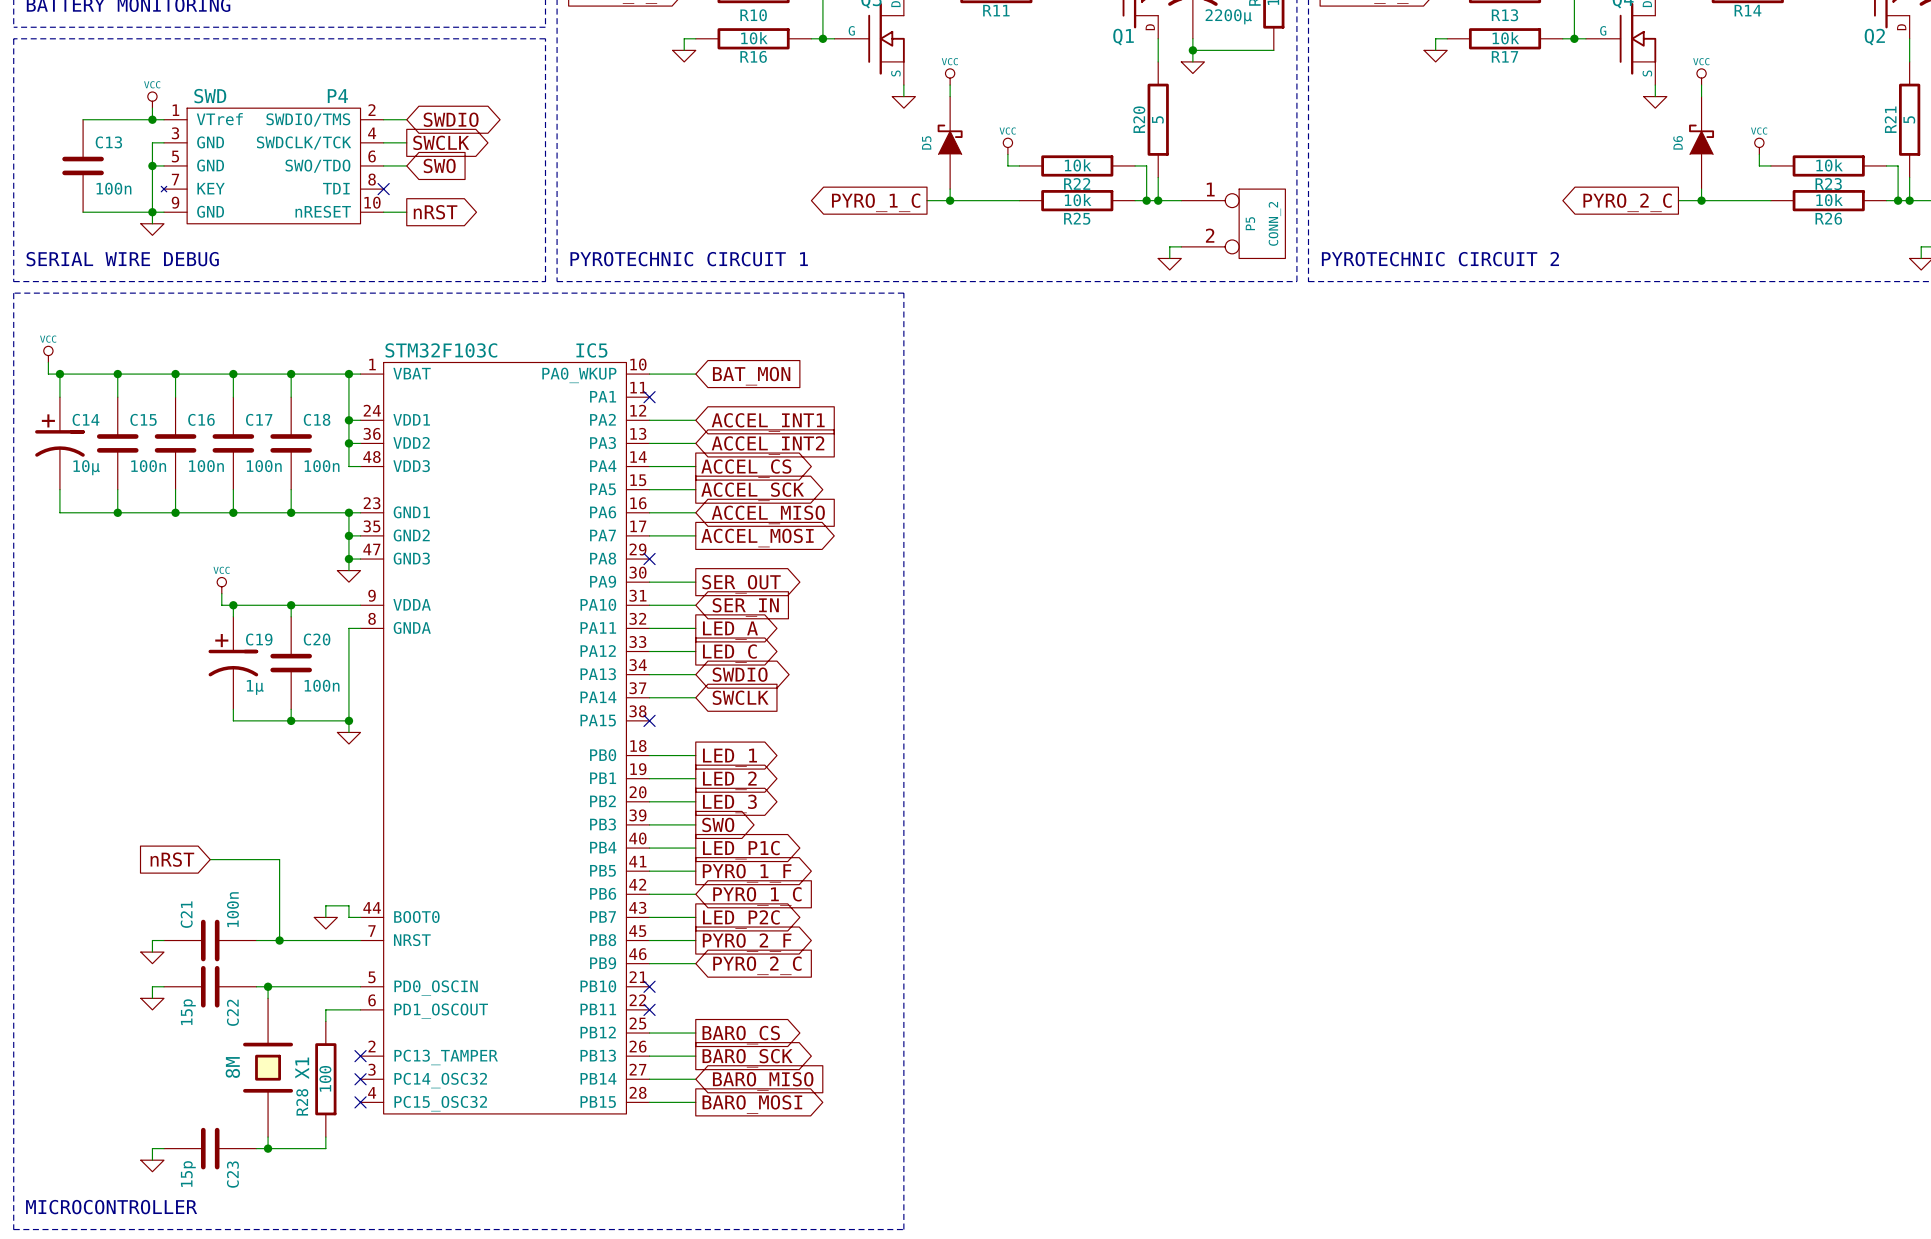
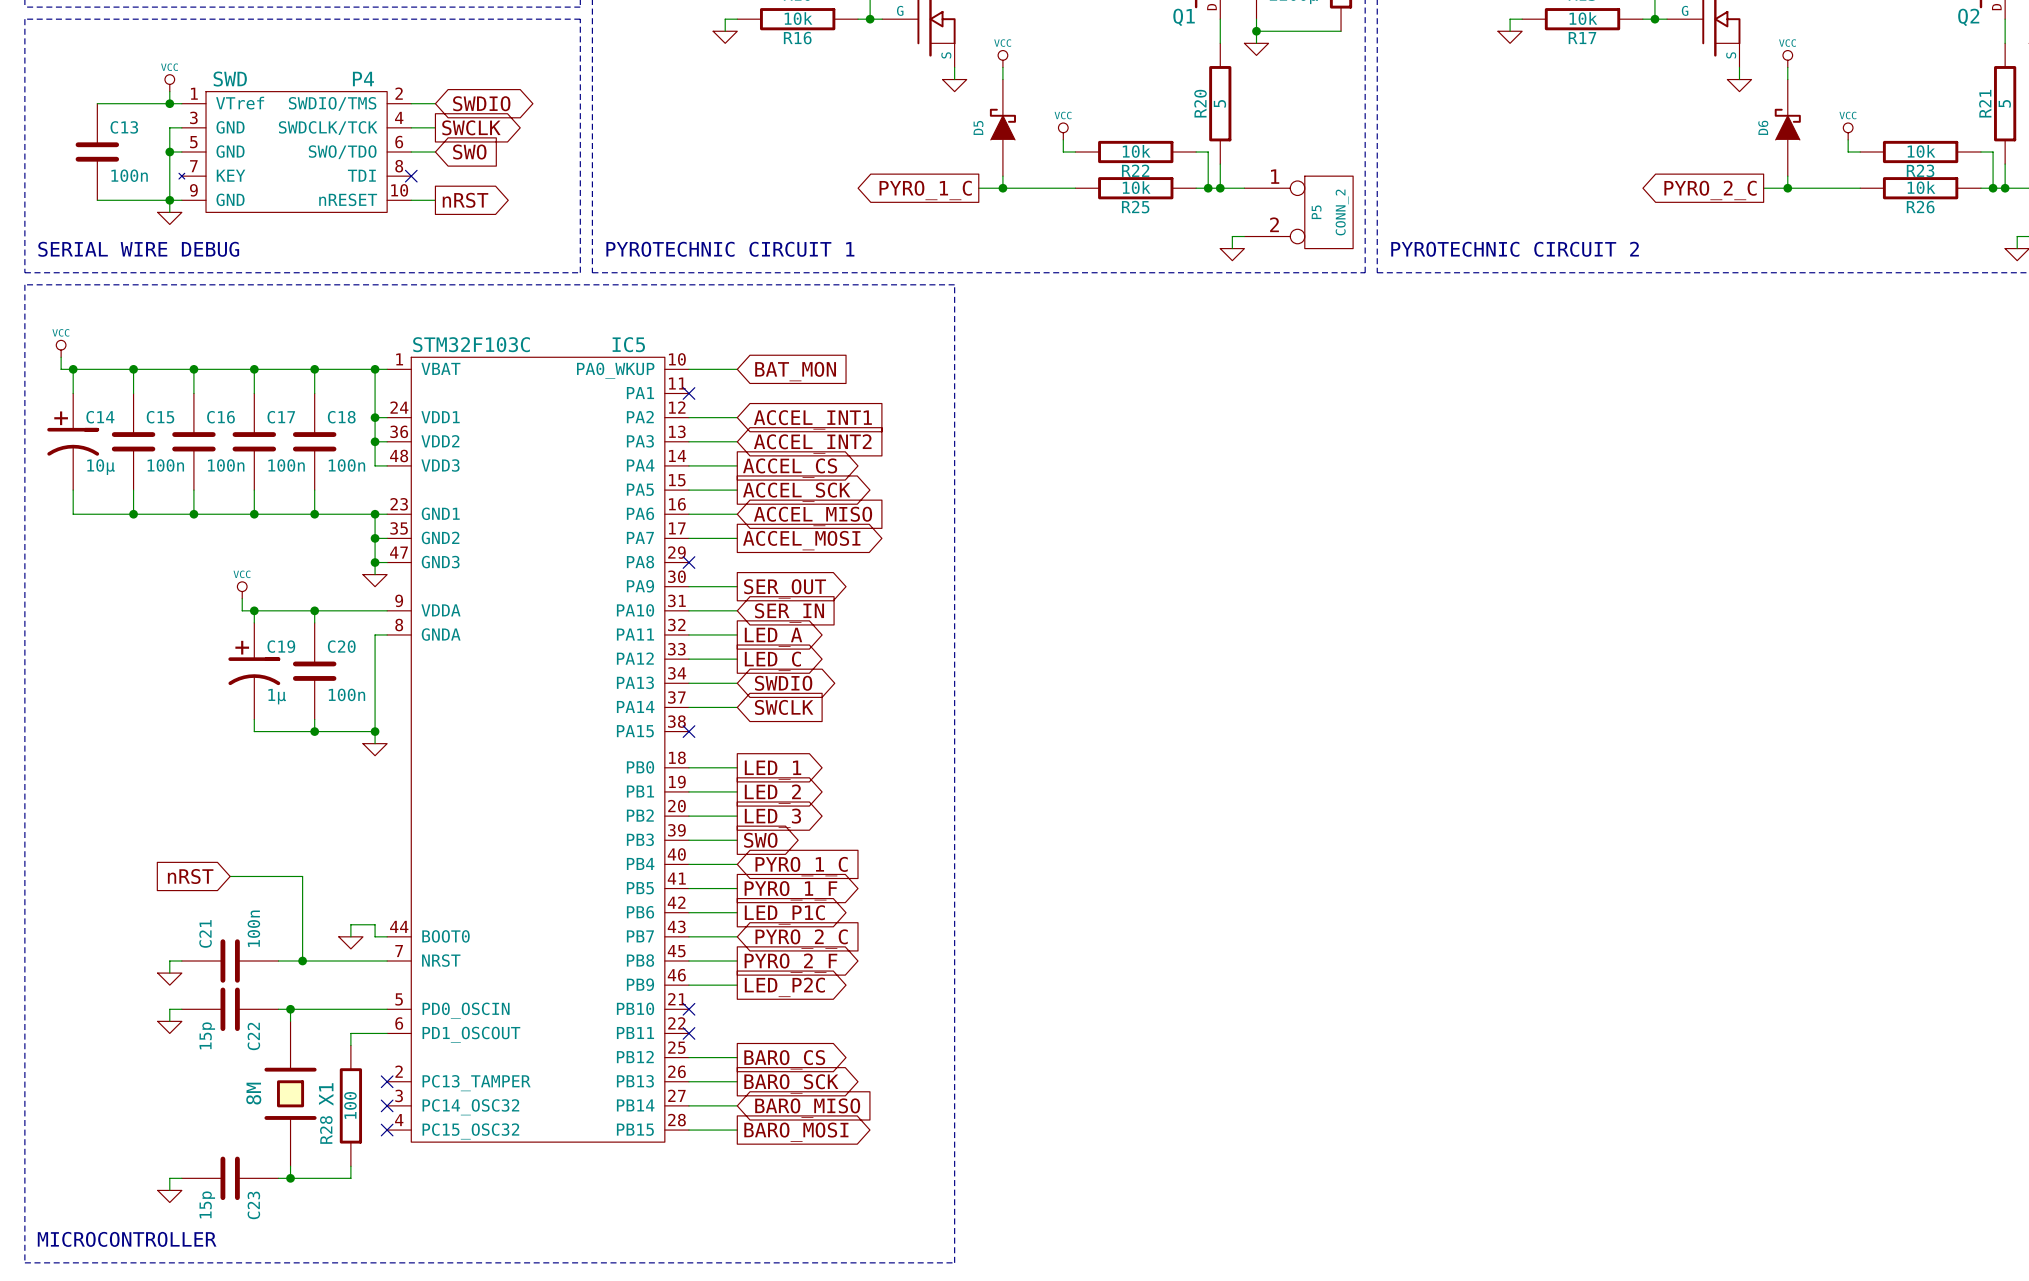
global label shape: output (741, 850) -> input (801, 866)
global label: LED_P1C (741, 850) -> PYRO_1_C (801, 866)
global label shape: input (757, 896) -> output (784, 914)
global label: PYRO_1_C (757, 896) -> LED_P1C (784, 914)
global label shape: output (741, 919) -> input (801, 939)
global label: LED_P2C (741, 919) -> PYRO_2_C (801, 939)
global label shape: input (757, 965) -> output (784, 987)
global label: PYRO_2_C (757, 965) -> LED_P2C (784, 987)

